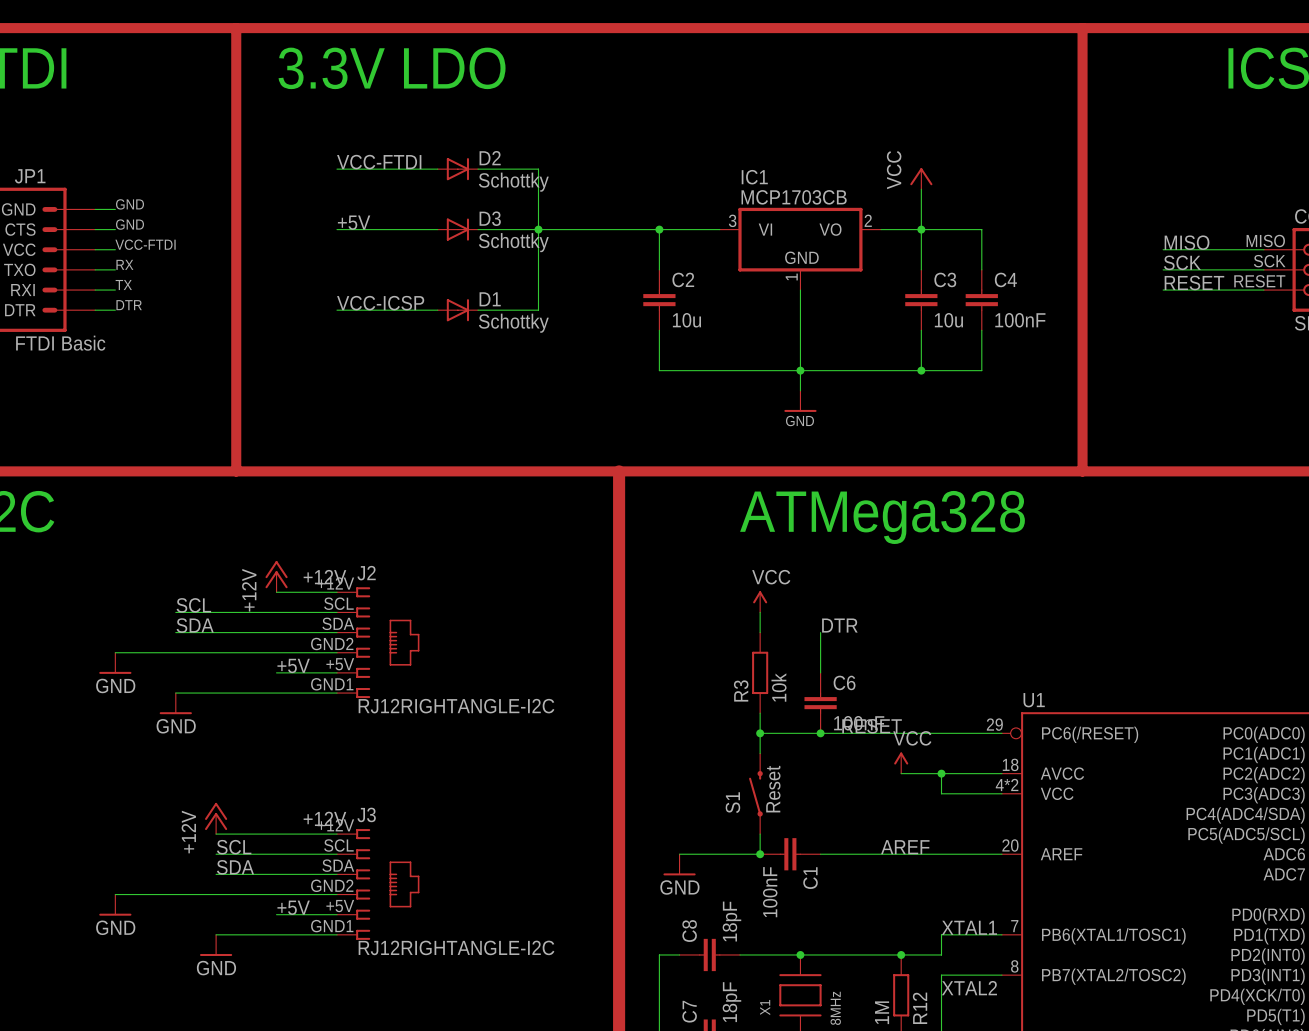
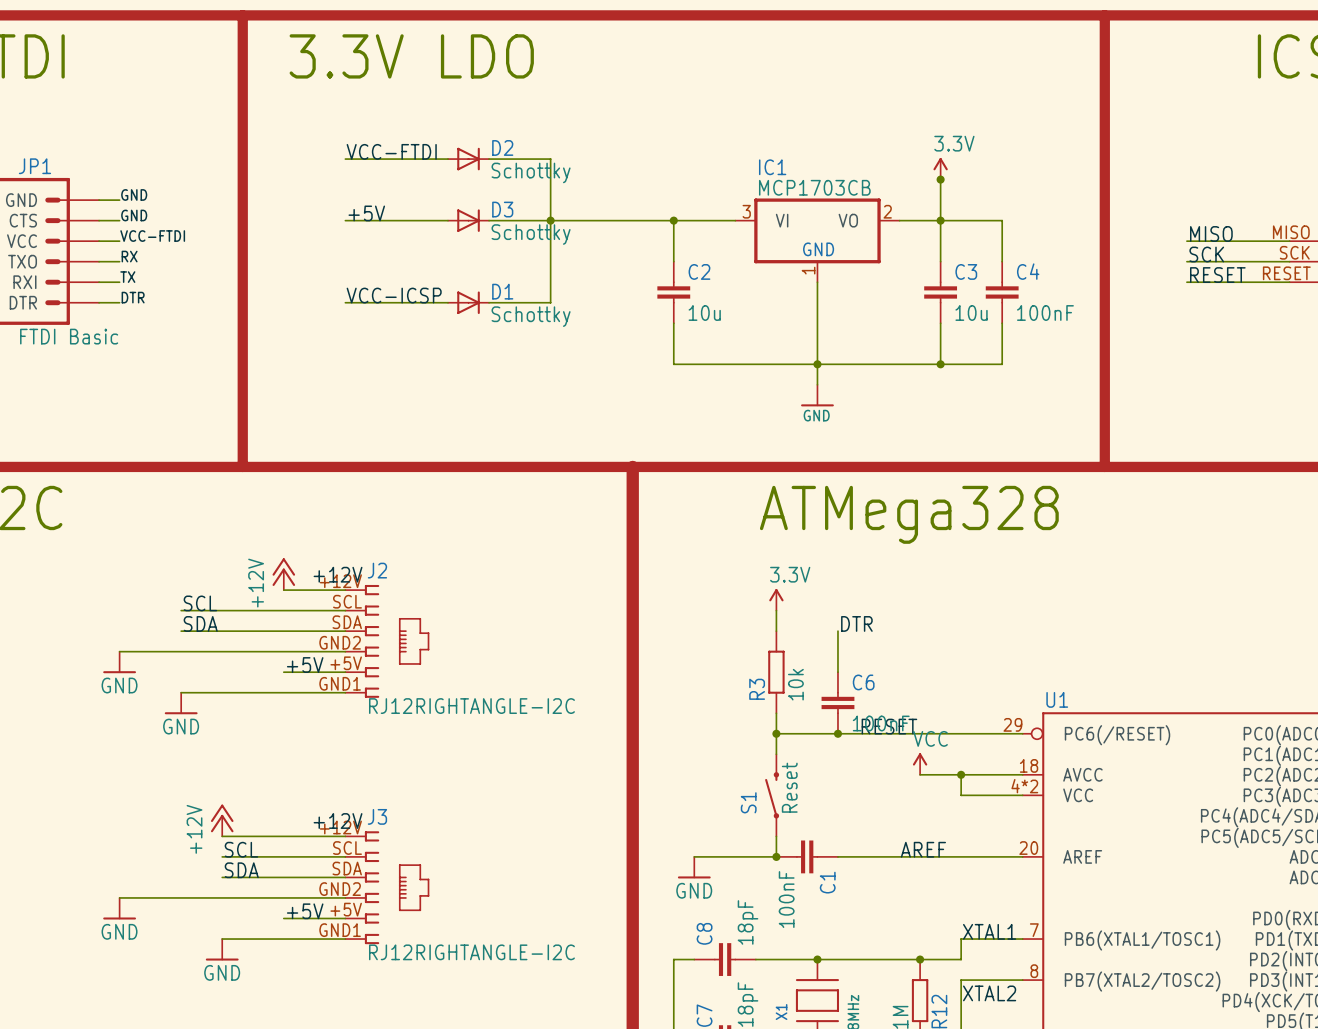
power symbol: VCC (921, 178) -> 3.3V (940, 168)
junction: none -> (940, 179)
power symbol: VCC (760, 601) -> 3.3V (776, 599)

